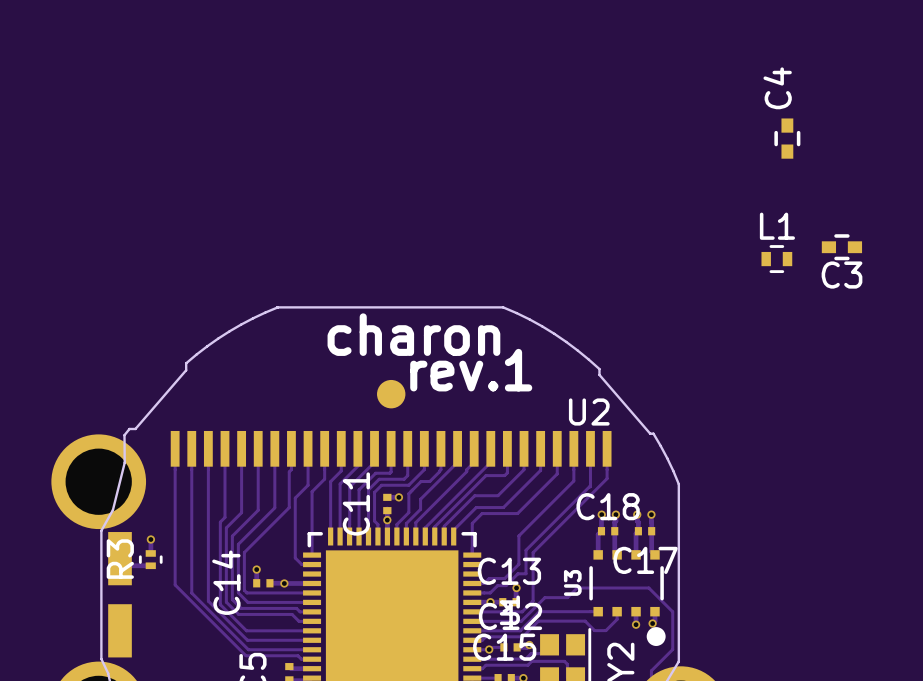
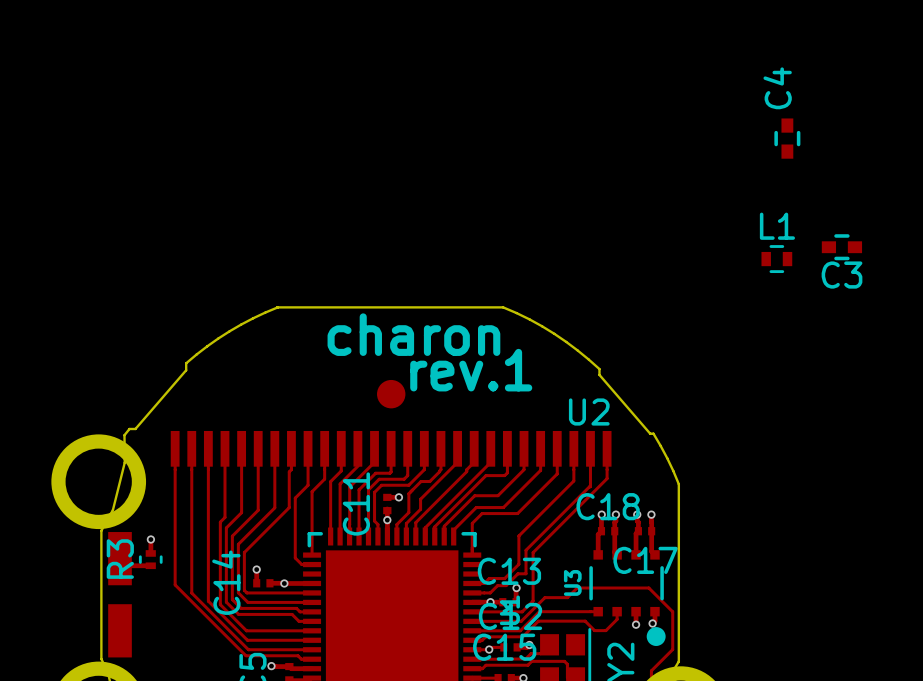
via: none -> (271, 666)
track: none -> (275, 666) (289, 666)

